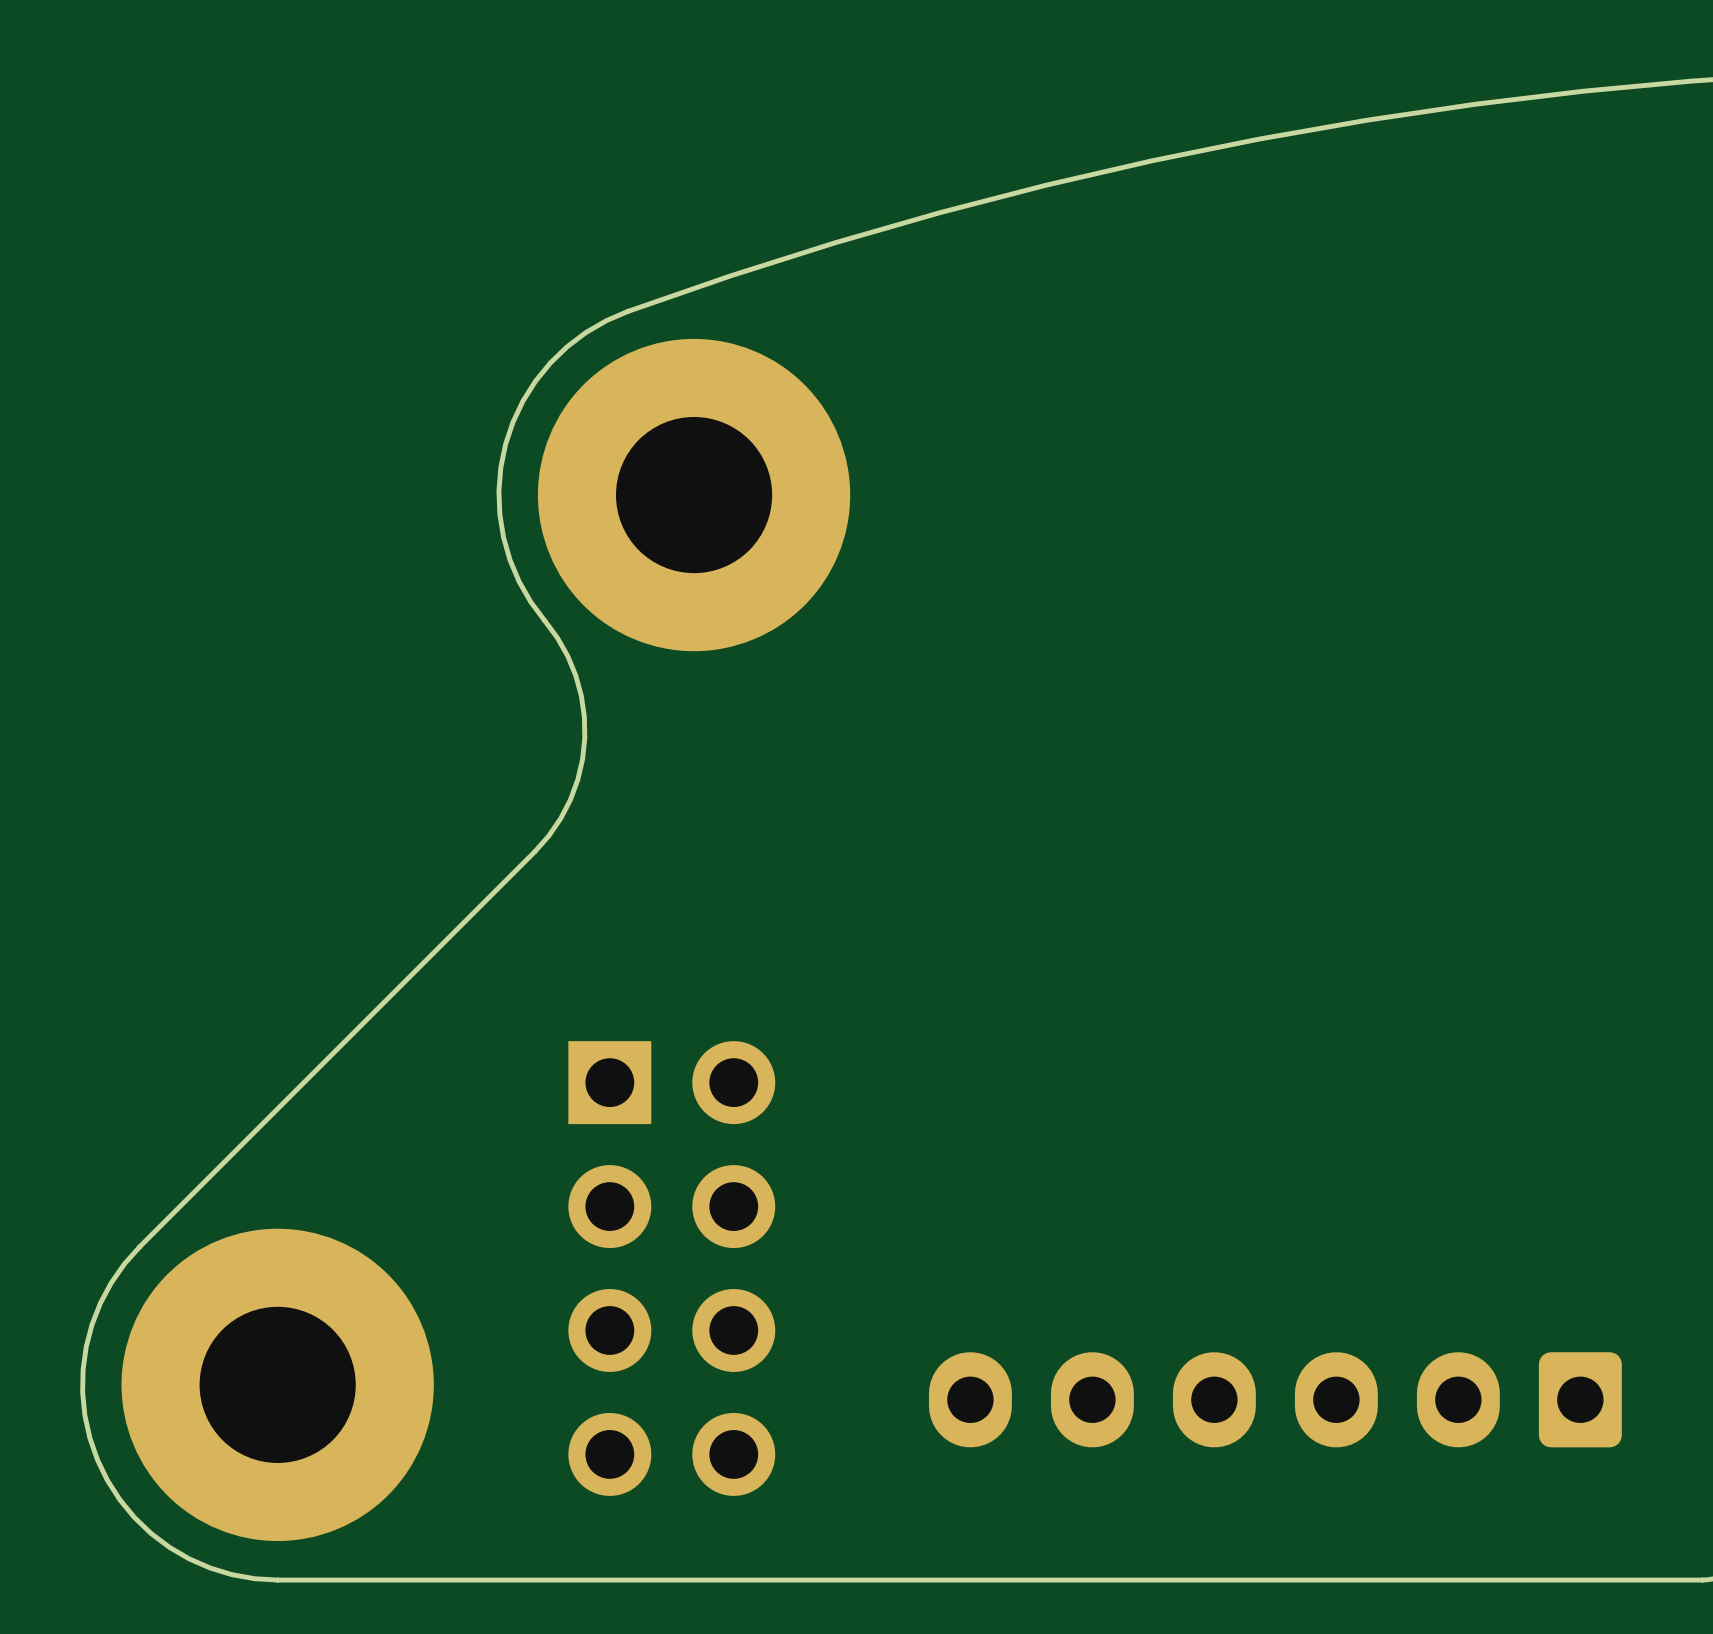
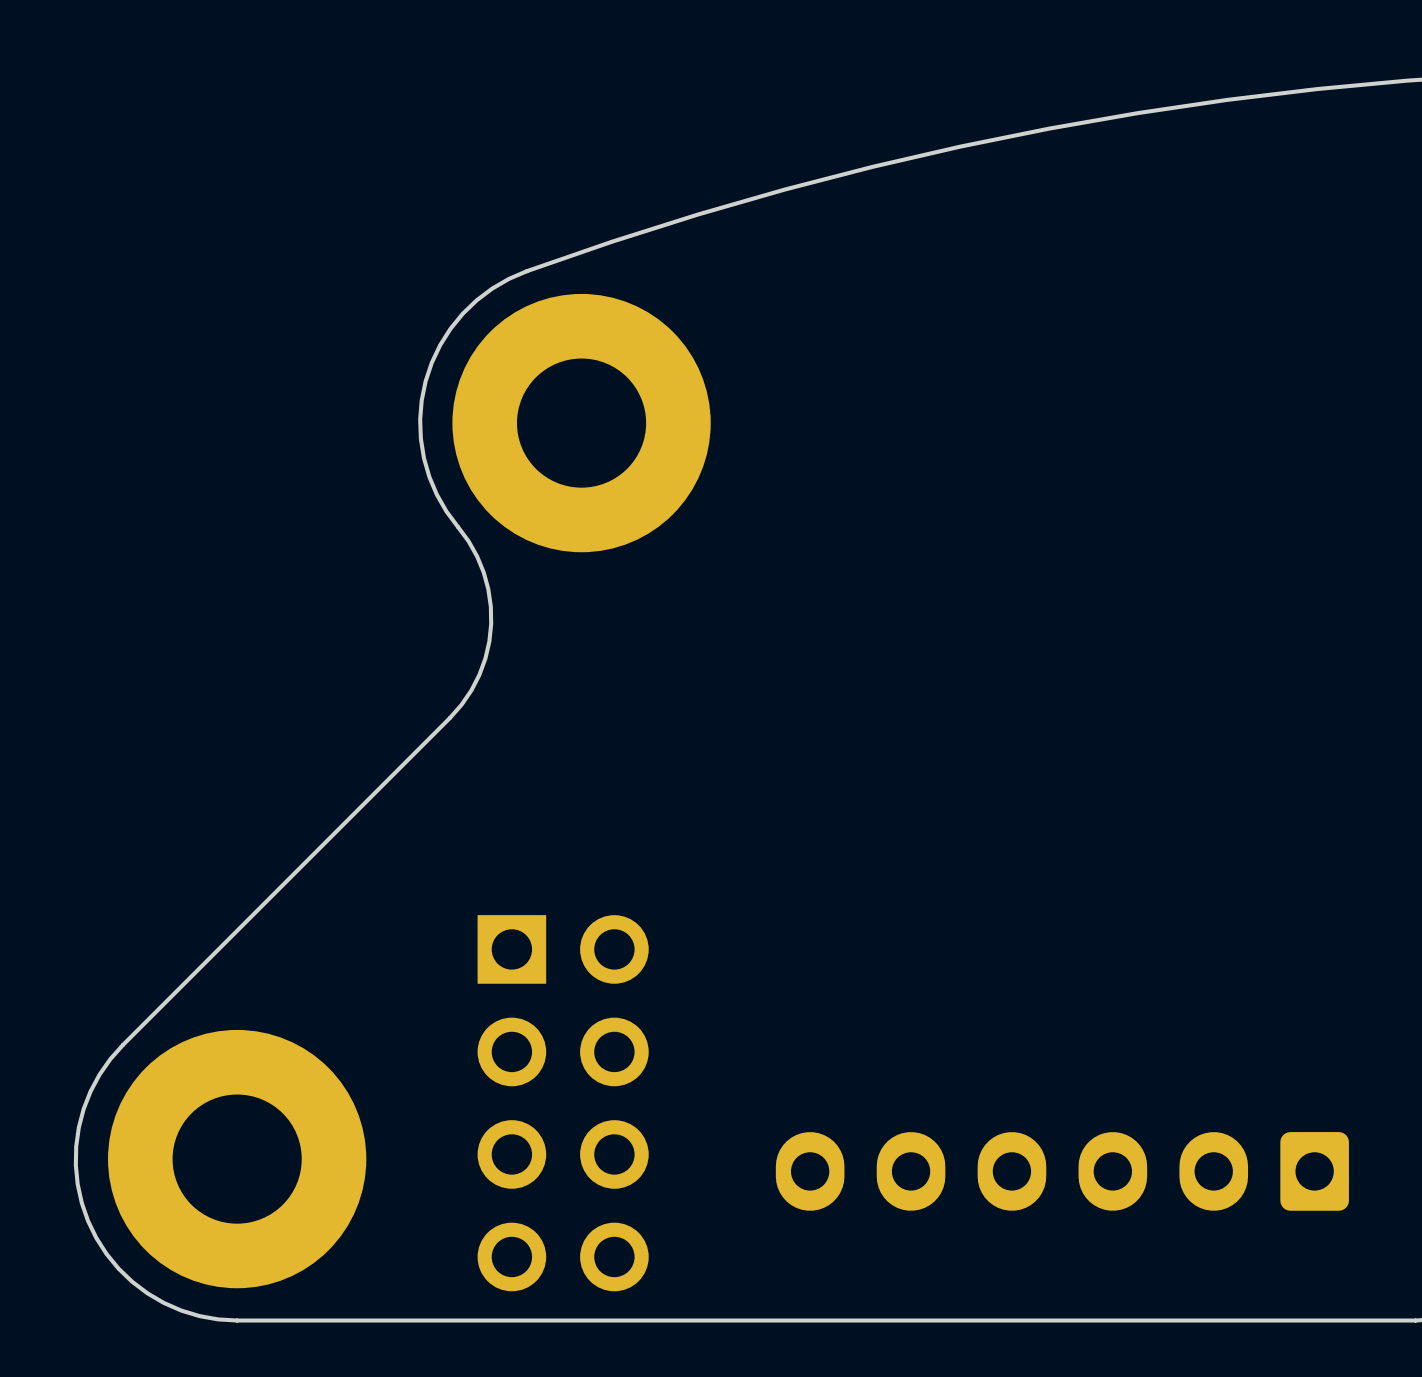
part position: (671, 1268) -> (563, 1103)

